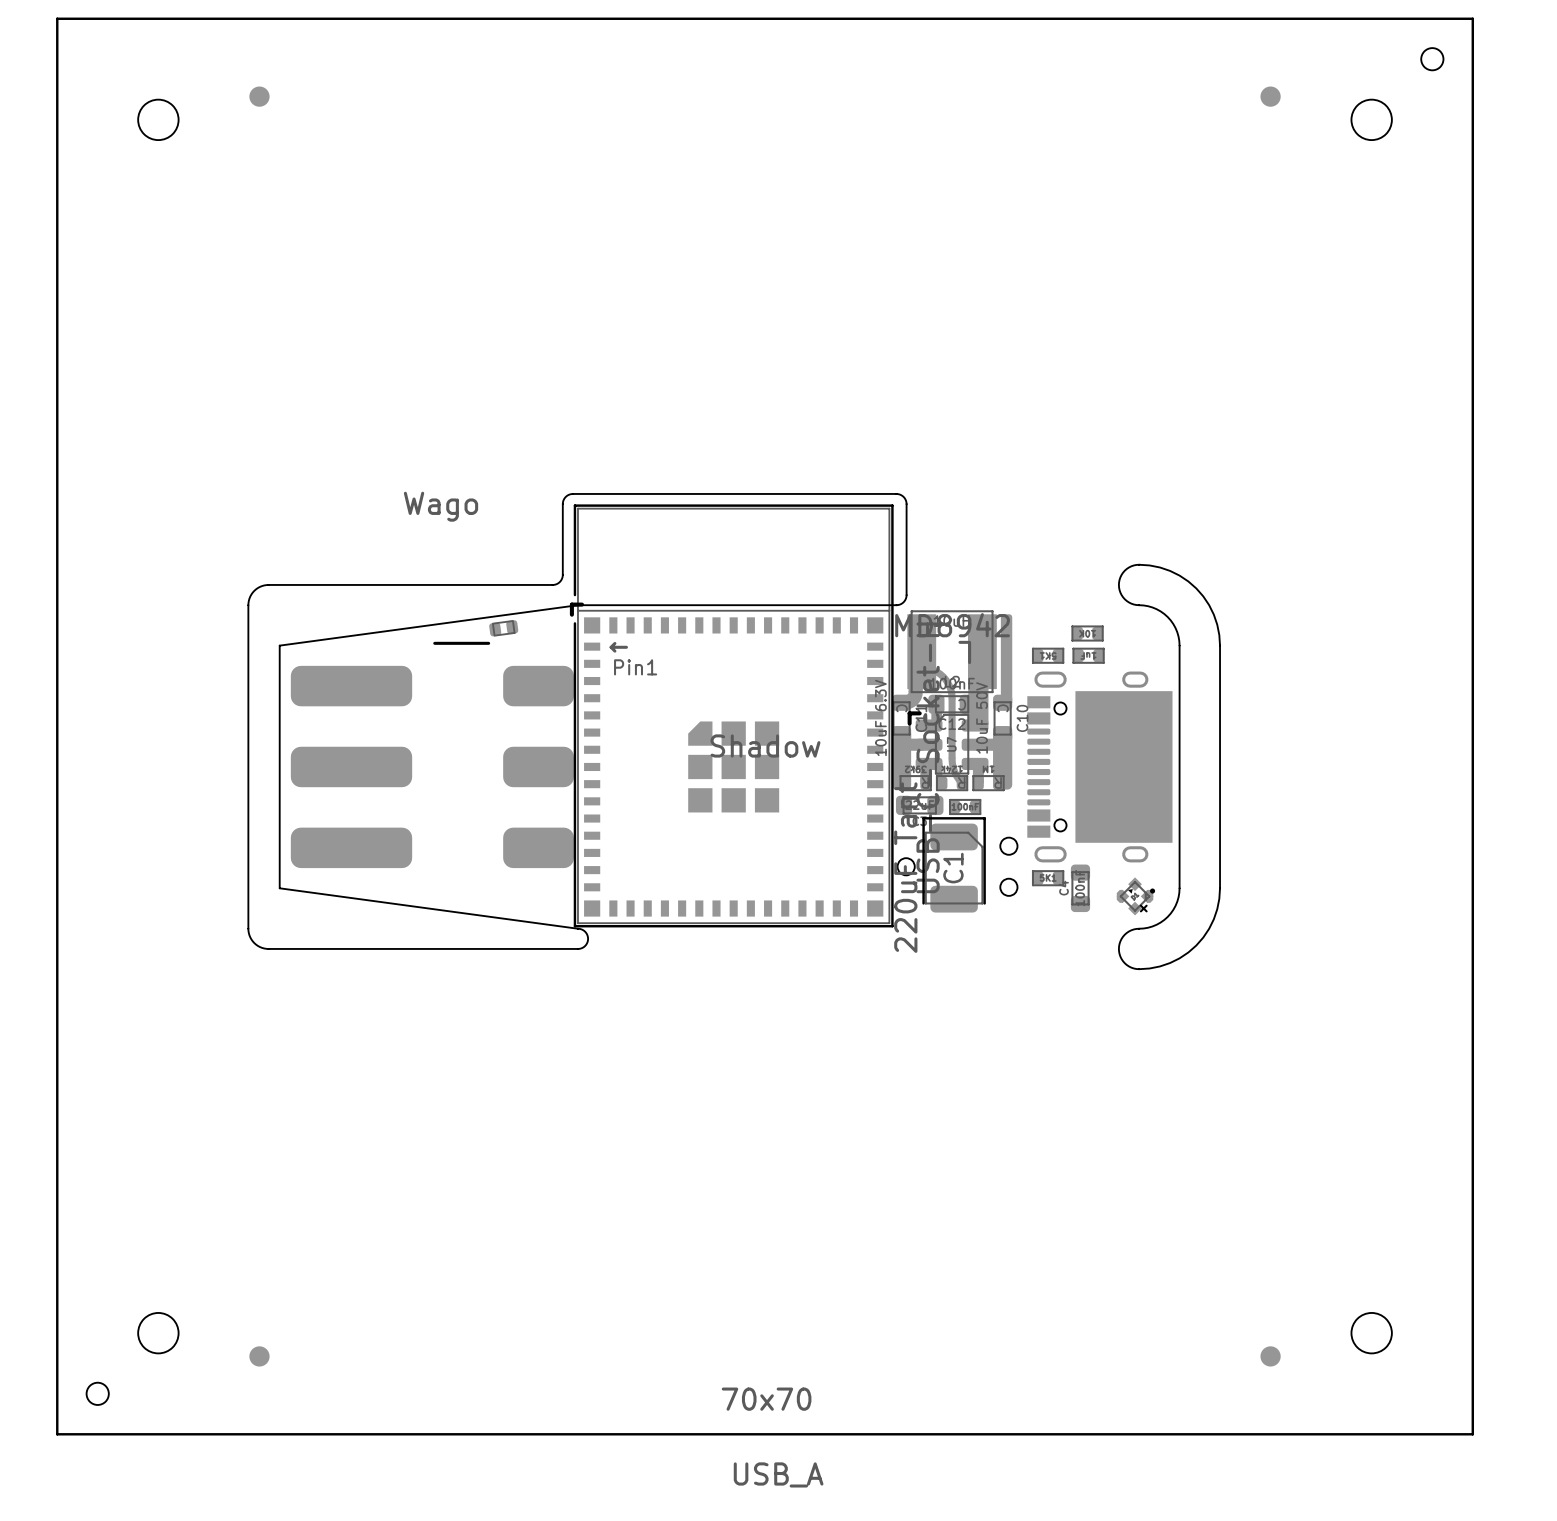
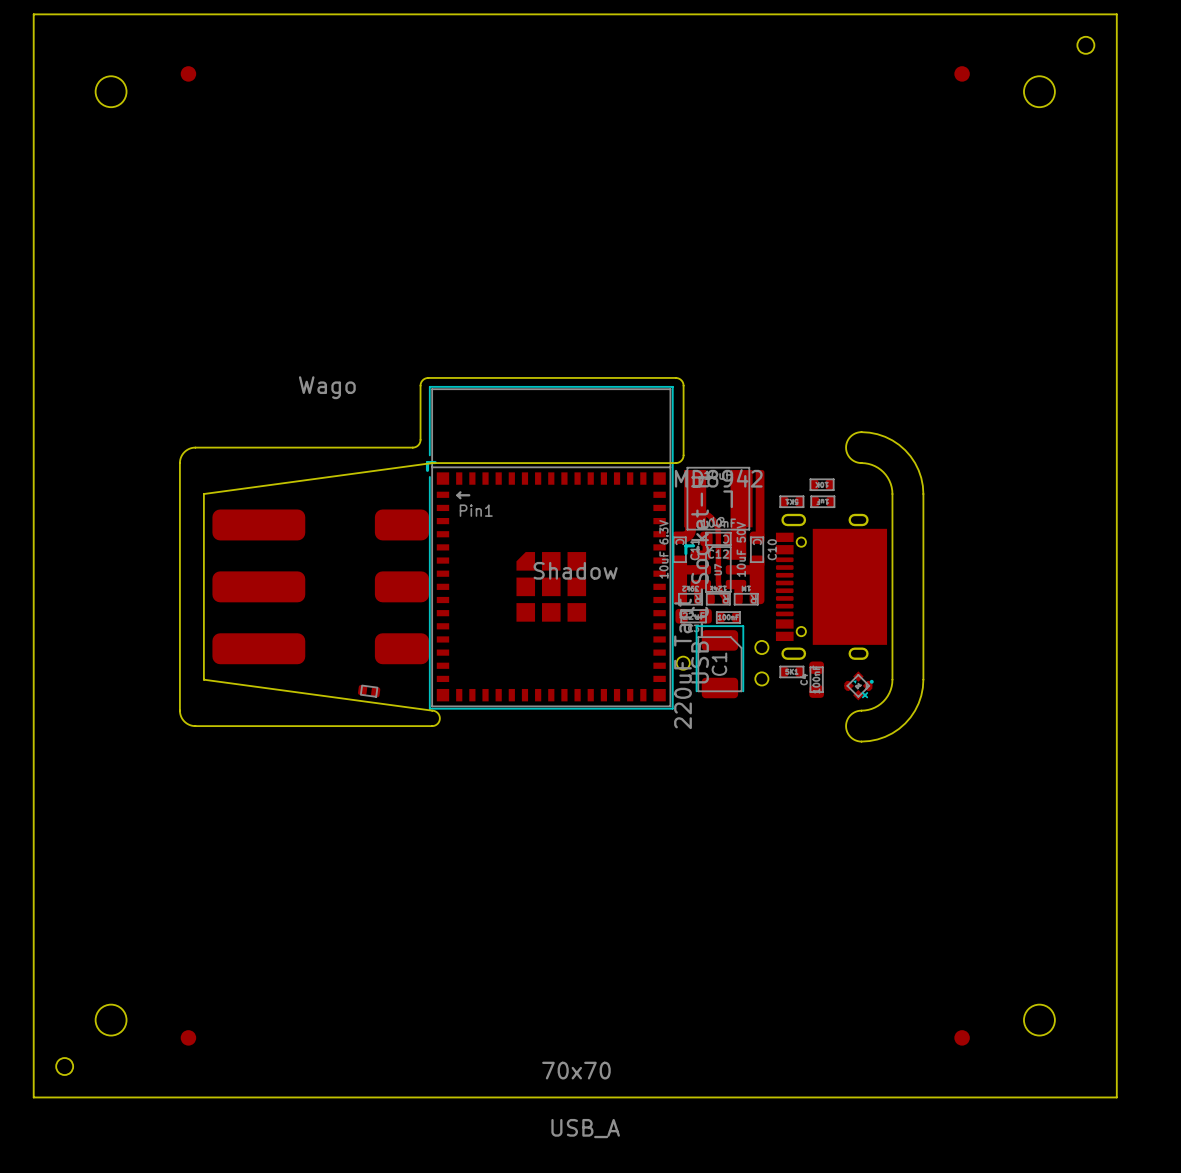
part: (503, 628) -> none
text: - (461, 643) -> none
part: none -> (369, 691)

